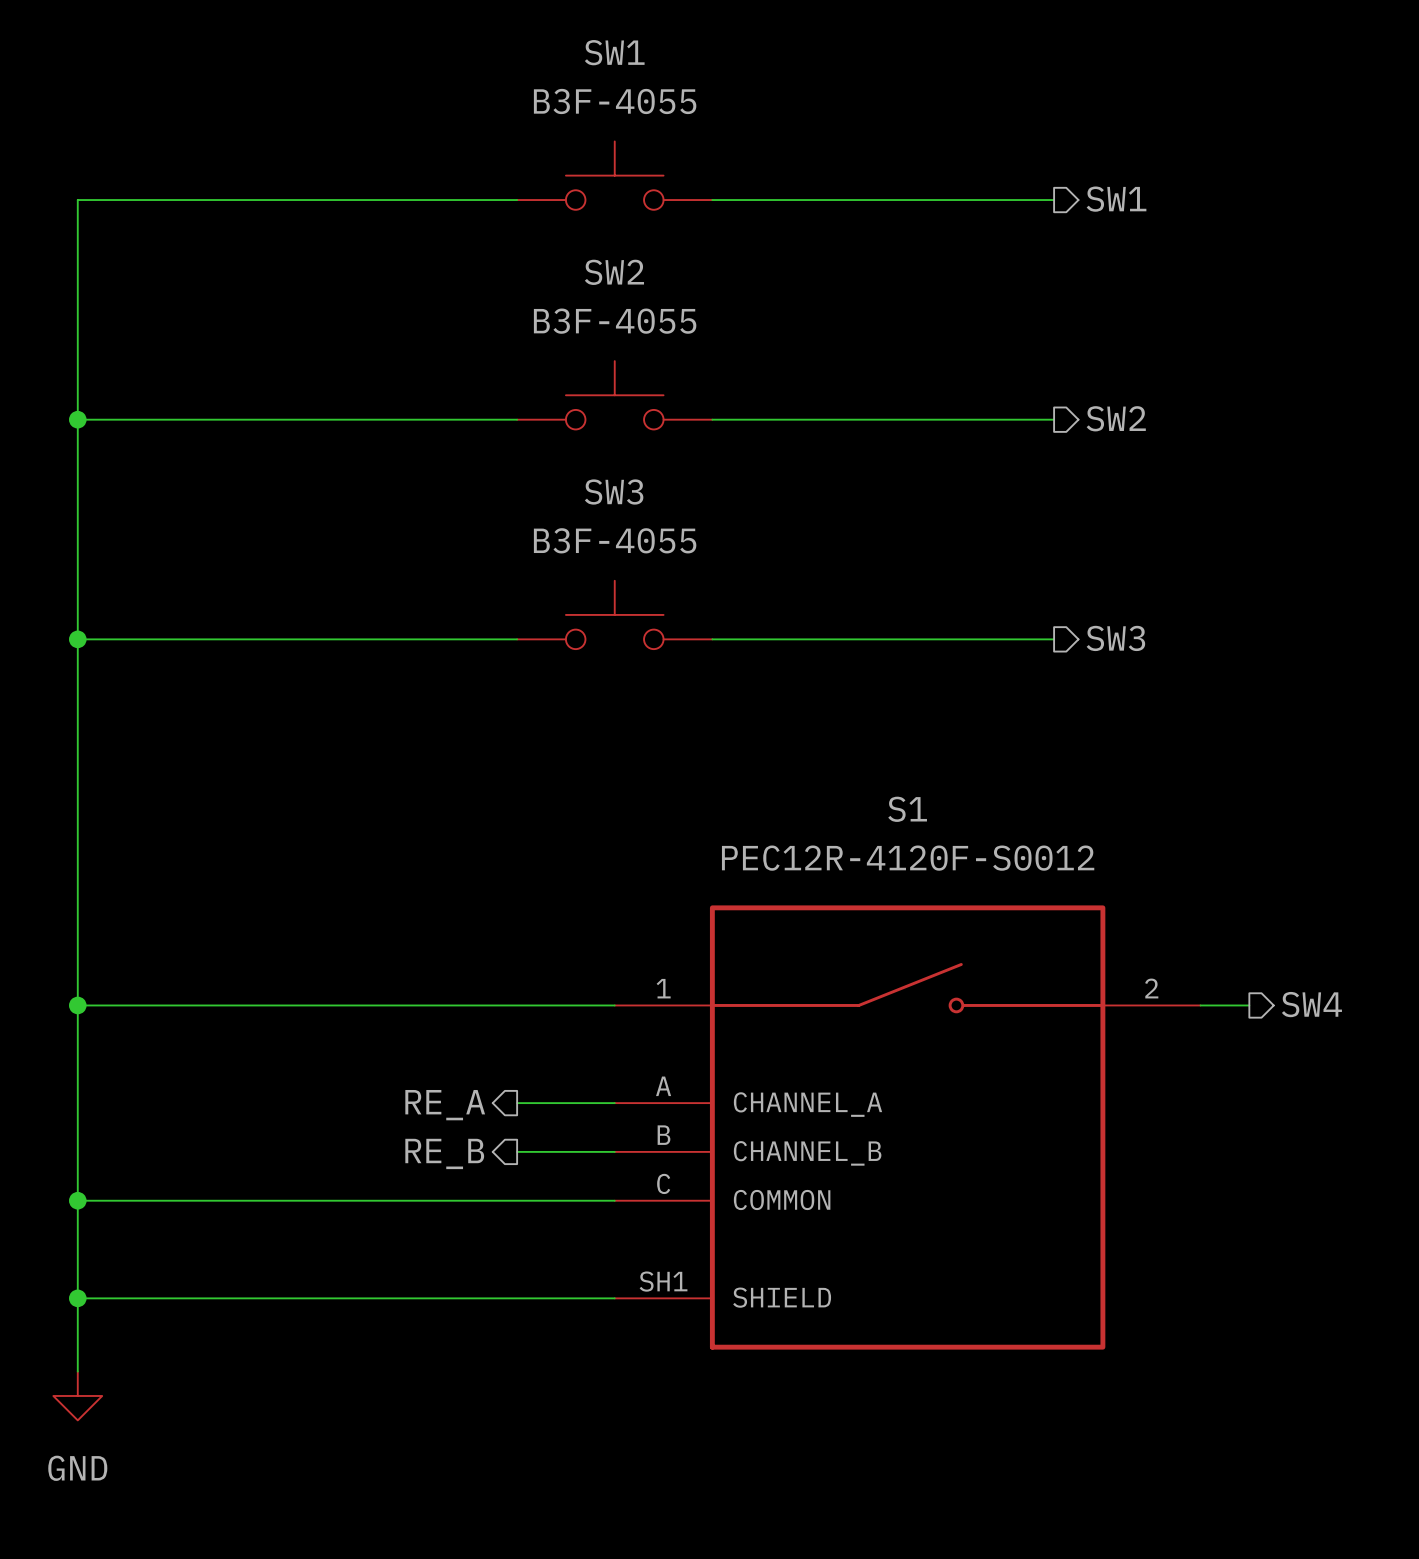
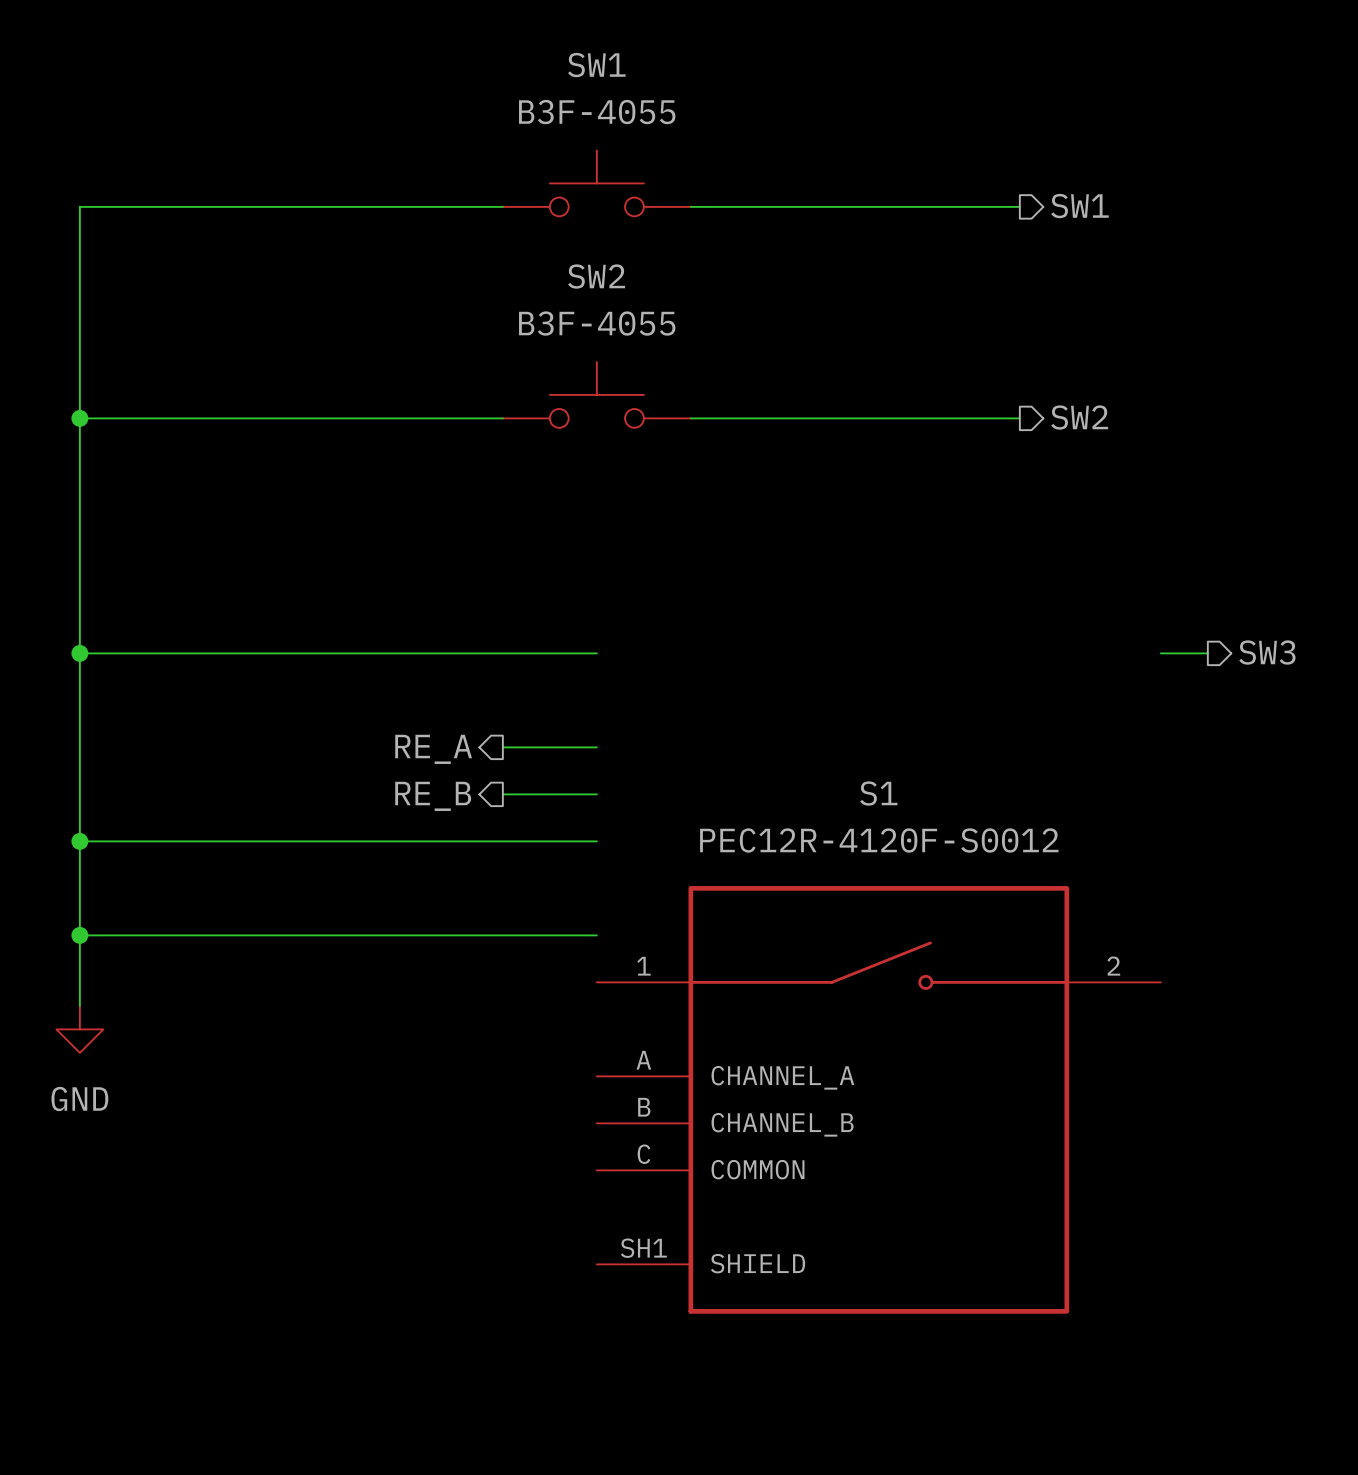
SW3: B3F-4055 (614, 614) -> none
hierarchical label position: SW3 (1115, 638) -> SW3 (1267, 652)
wire: (77, 639) (517, 639) -> none
junction position: (77, 639) -> (79, 653)
wire: (712, 639) (1054, 639) -> none
junction: none -> (79, 841)
hierarchical label: SW4 (1311, 1004) -> none
wire: (77, 1005) (614, 1005) -> (79, 653) (596, 653)
junction position: (77, 1005) -> (79, 935)
wire: (1200, 1005) (1249, 1005) -> (1160, 653) (1207, 653)
wire: (77, 1029) (77, 1371) -> none
wire: (517, 1103) (614, 1103) -> (502, 747) (596, 747)
hierarchical label position: RE_A (445, 1105) -> RE_A (433, 749)
wire: (517, 1151) (614, 1151) -> (502, 794) (596, 794)
hierarchical label position: RE_B (444, 1153) -> RE_B (433, 796)
wire: (77, 1200) (614, 1200) -> (79, 841) (596, 841)
junction: (77, 1200) -> none
wire: (77, 1298) (614, 1298) -> (79, 935) (596, 935)
junction: (77, 1298) -> none
power symbol position: GND (77, 1395) -> GND (79, 1029)

